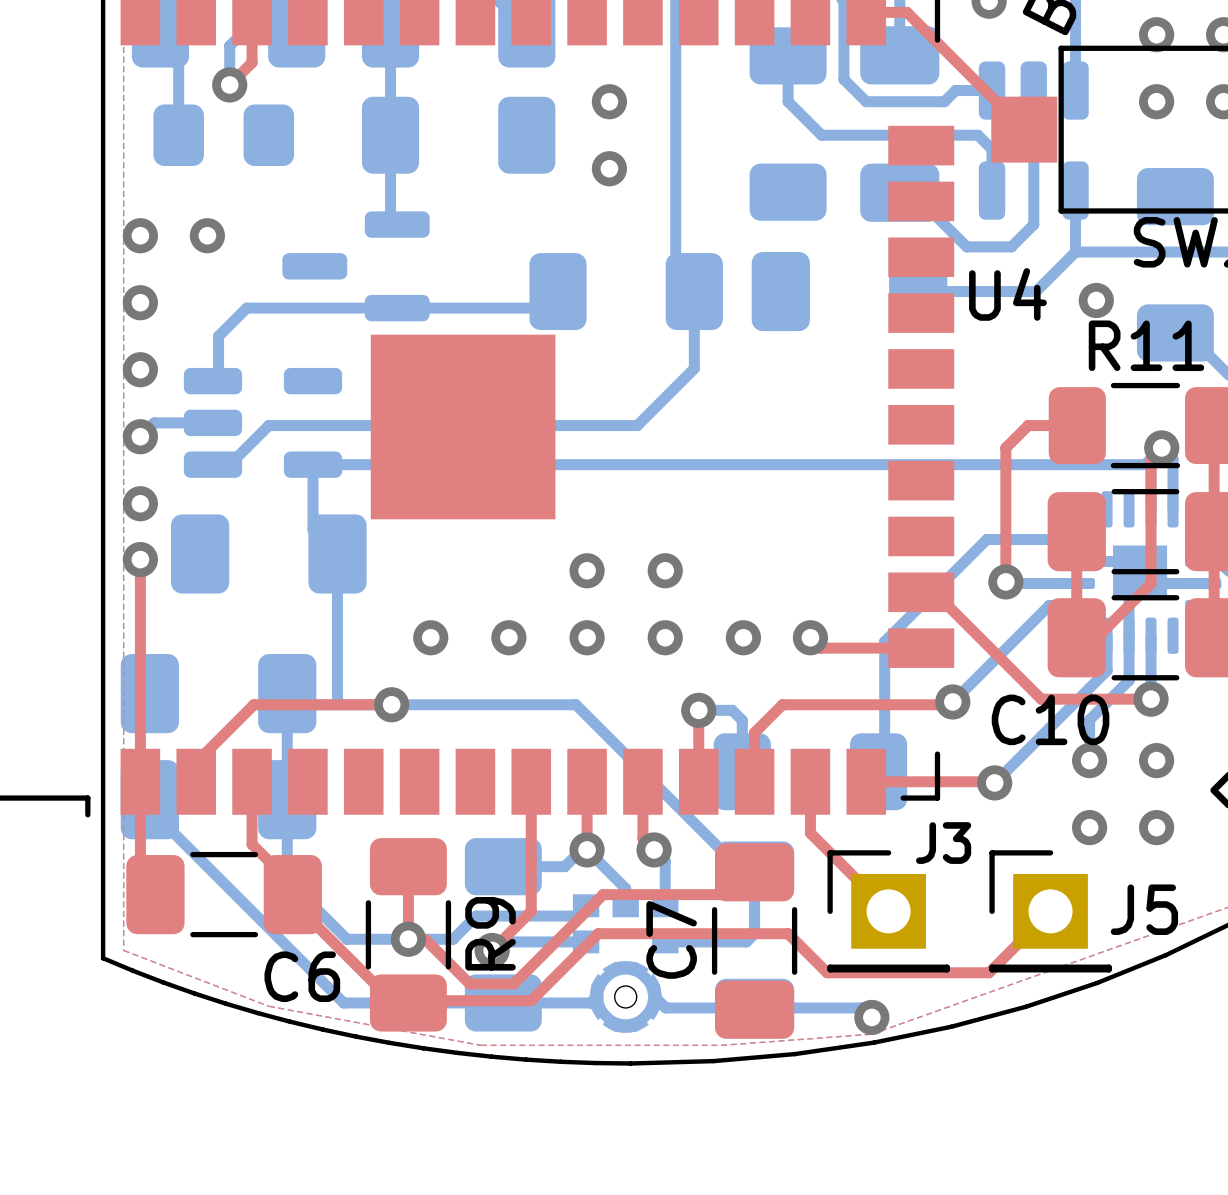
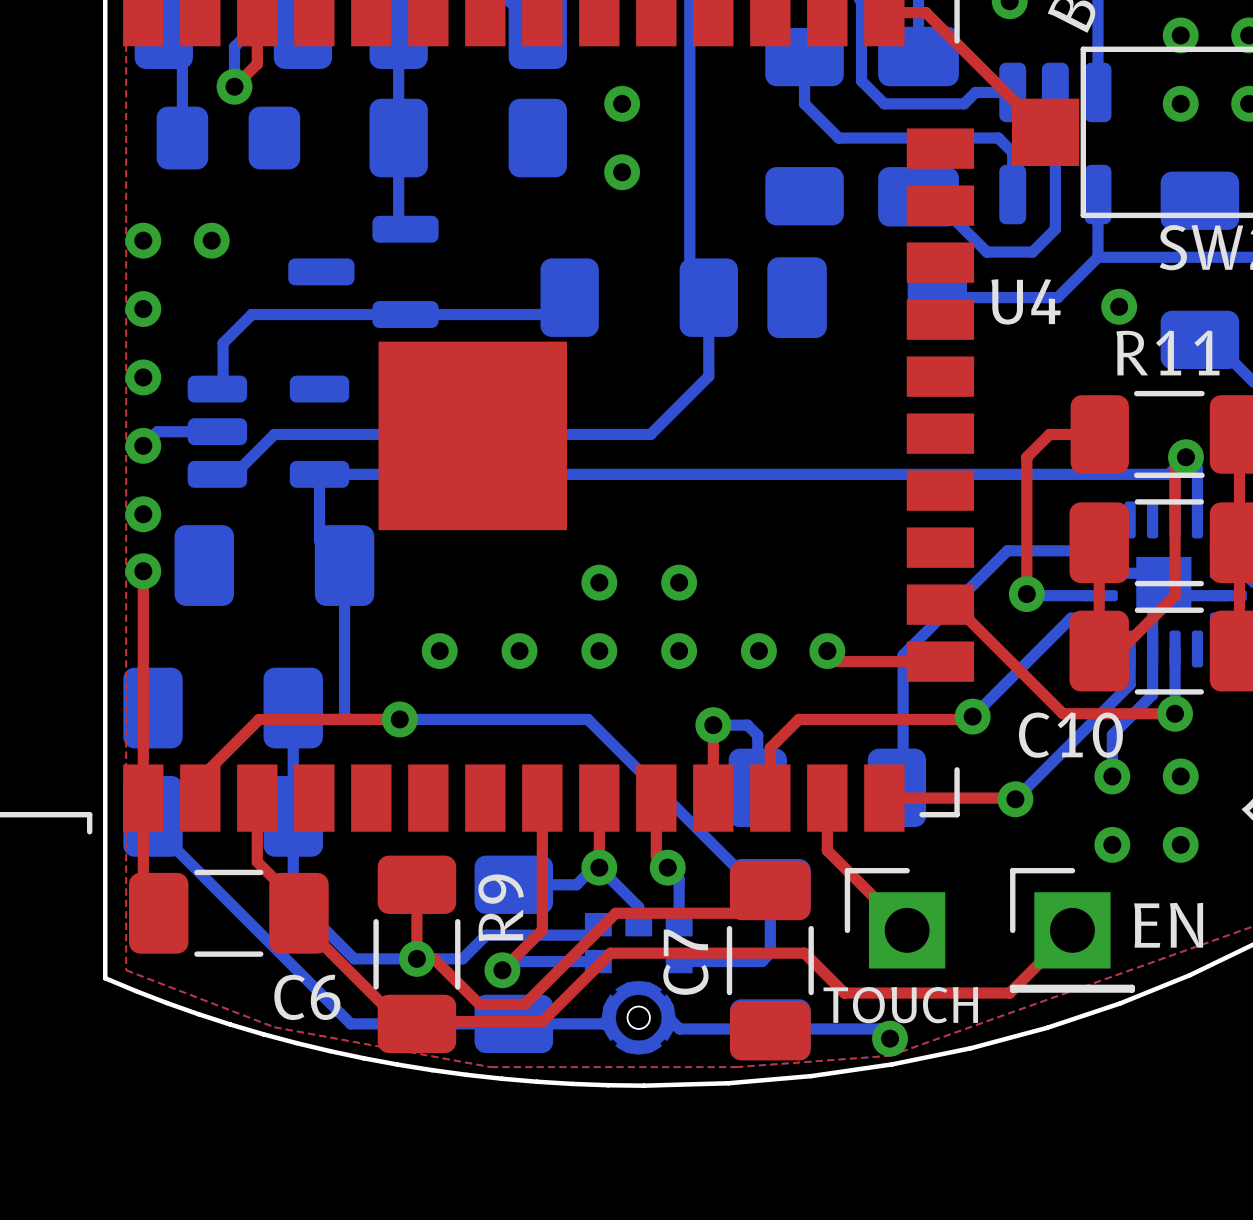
text: none -> EN (1168, 925)
J5 name: J5 (1144, 909) -> none
J3: (888, 911) -> none
R9 name position: R9 (490, 933) -> R9 (501, 907)
text: none -> TOUCH (900, 1005)

